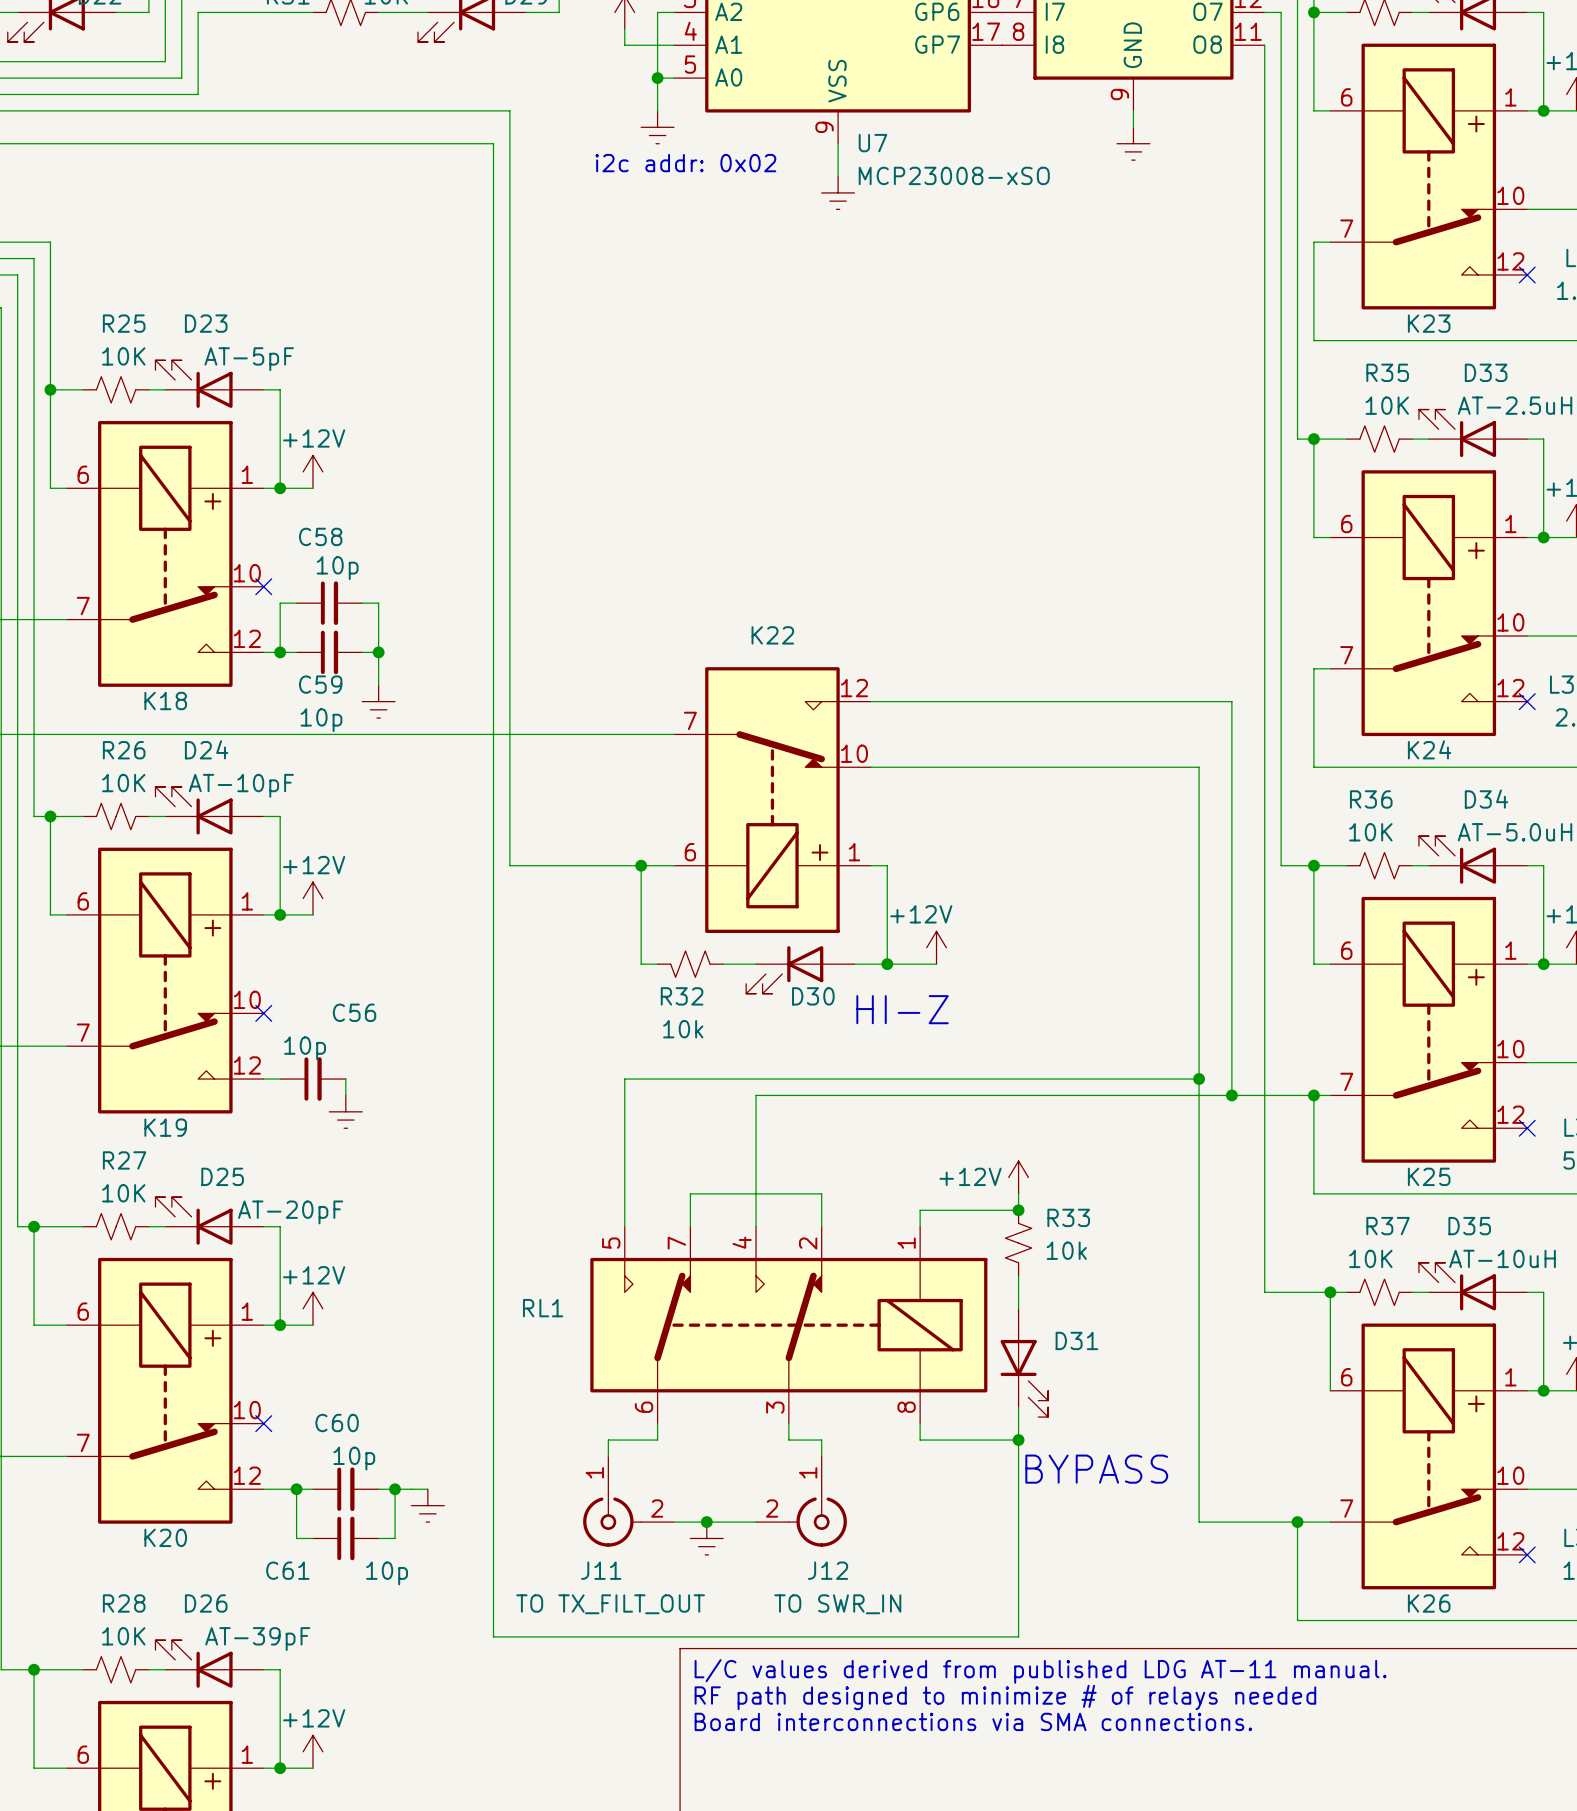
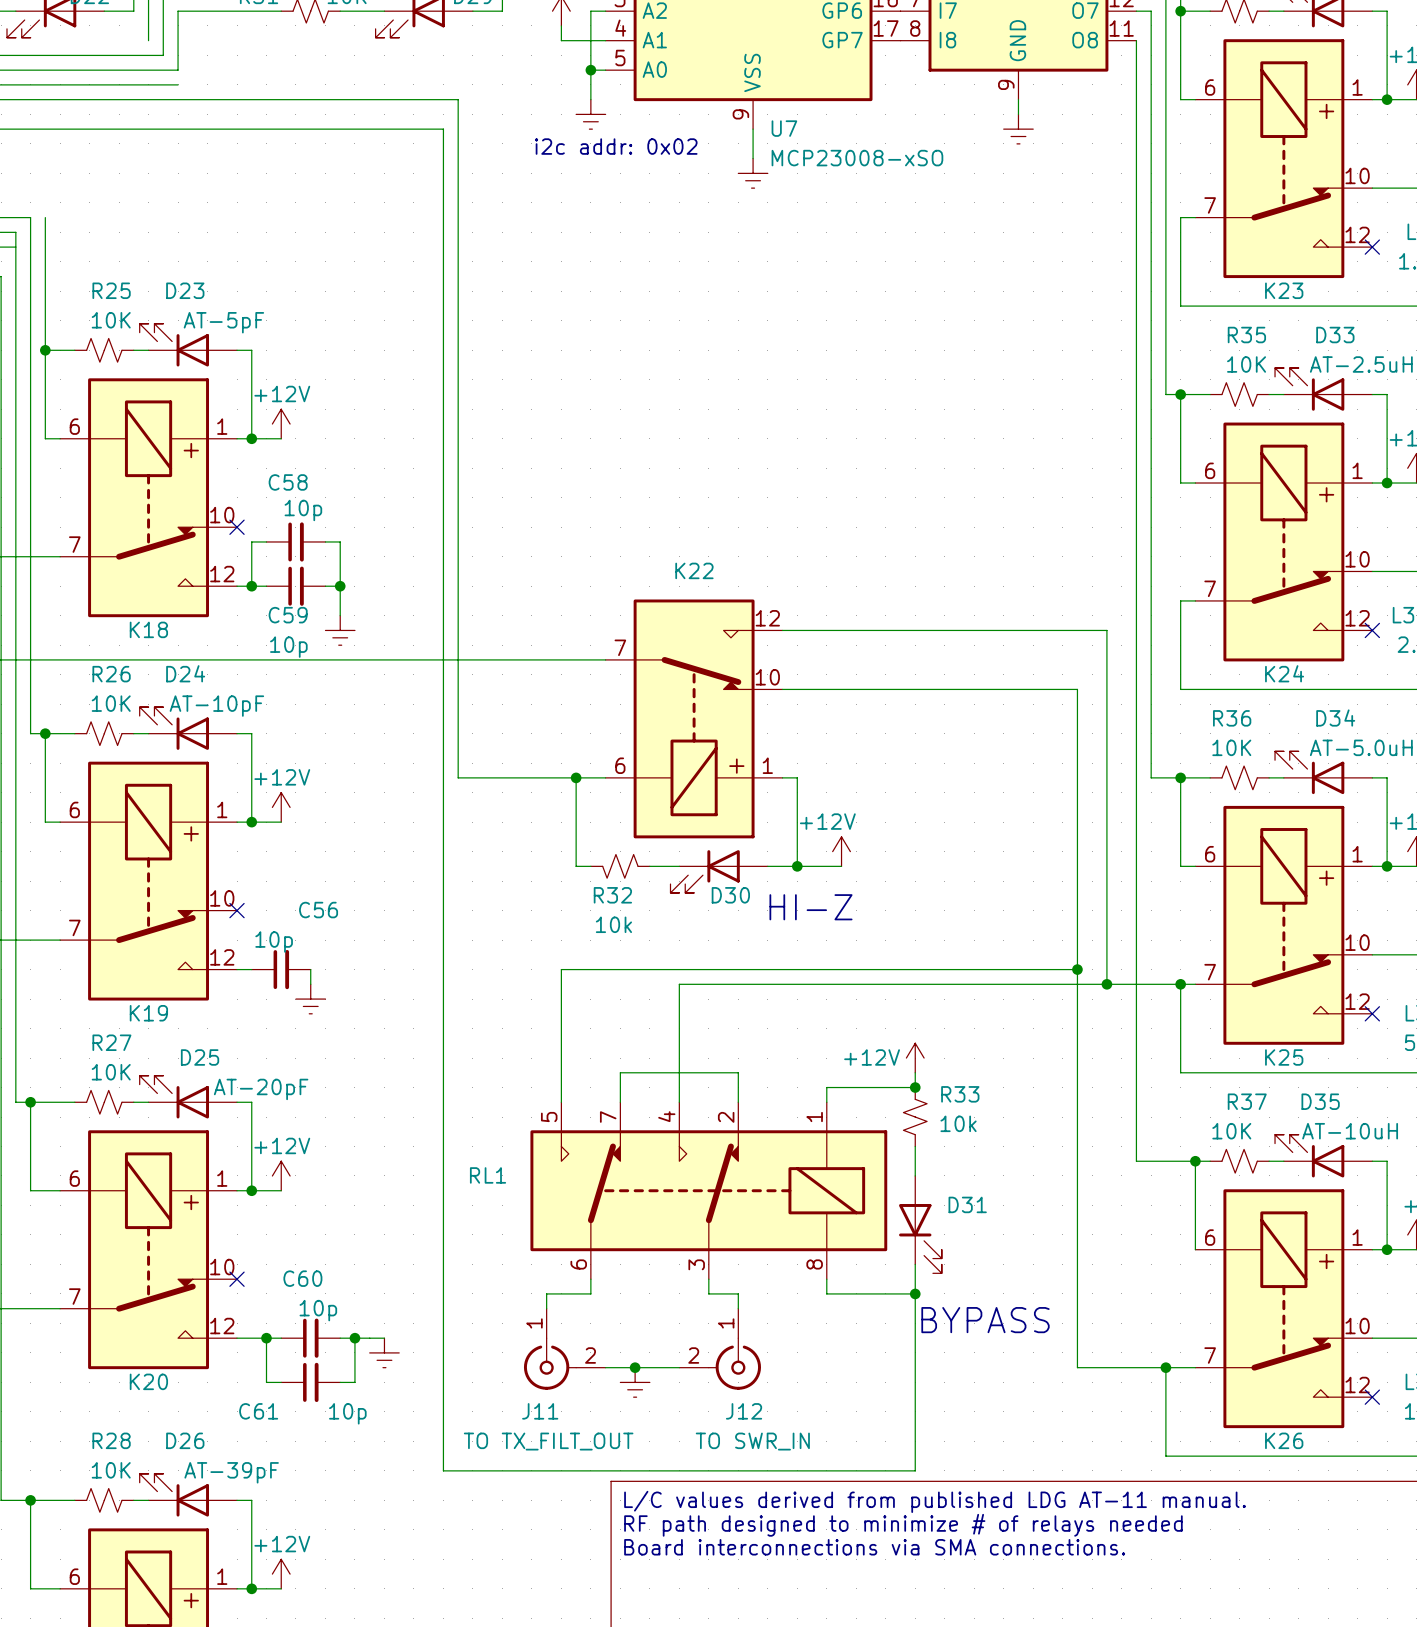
wire: (165, 45) (165, 61) -> (163, 55) (148, 55)
wire: (181, 61) (181, 78) -> none
wire: (198, 78) (198, 94) -> (178, 70) (163, 70)
wire: (34, 242) (50, 242) -> (30, 217) (30, 232)
wire: (17, 258) (34, 258) -> (15, 232) (15, 247)

